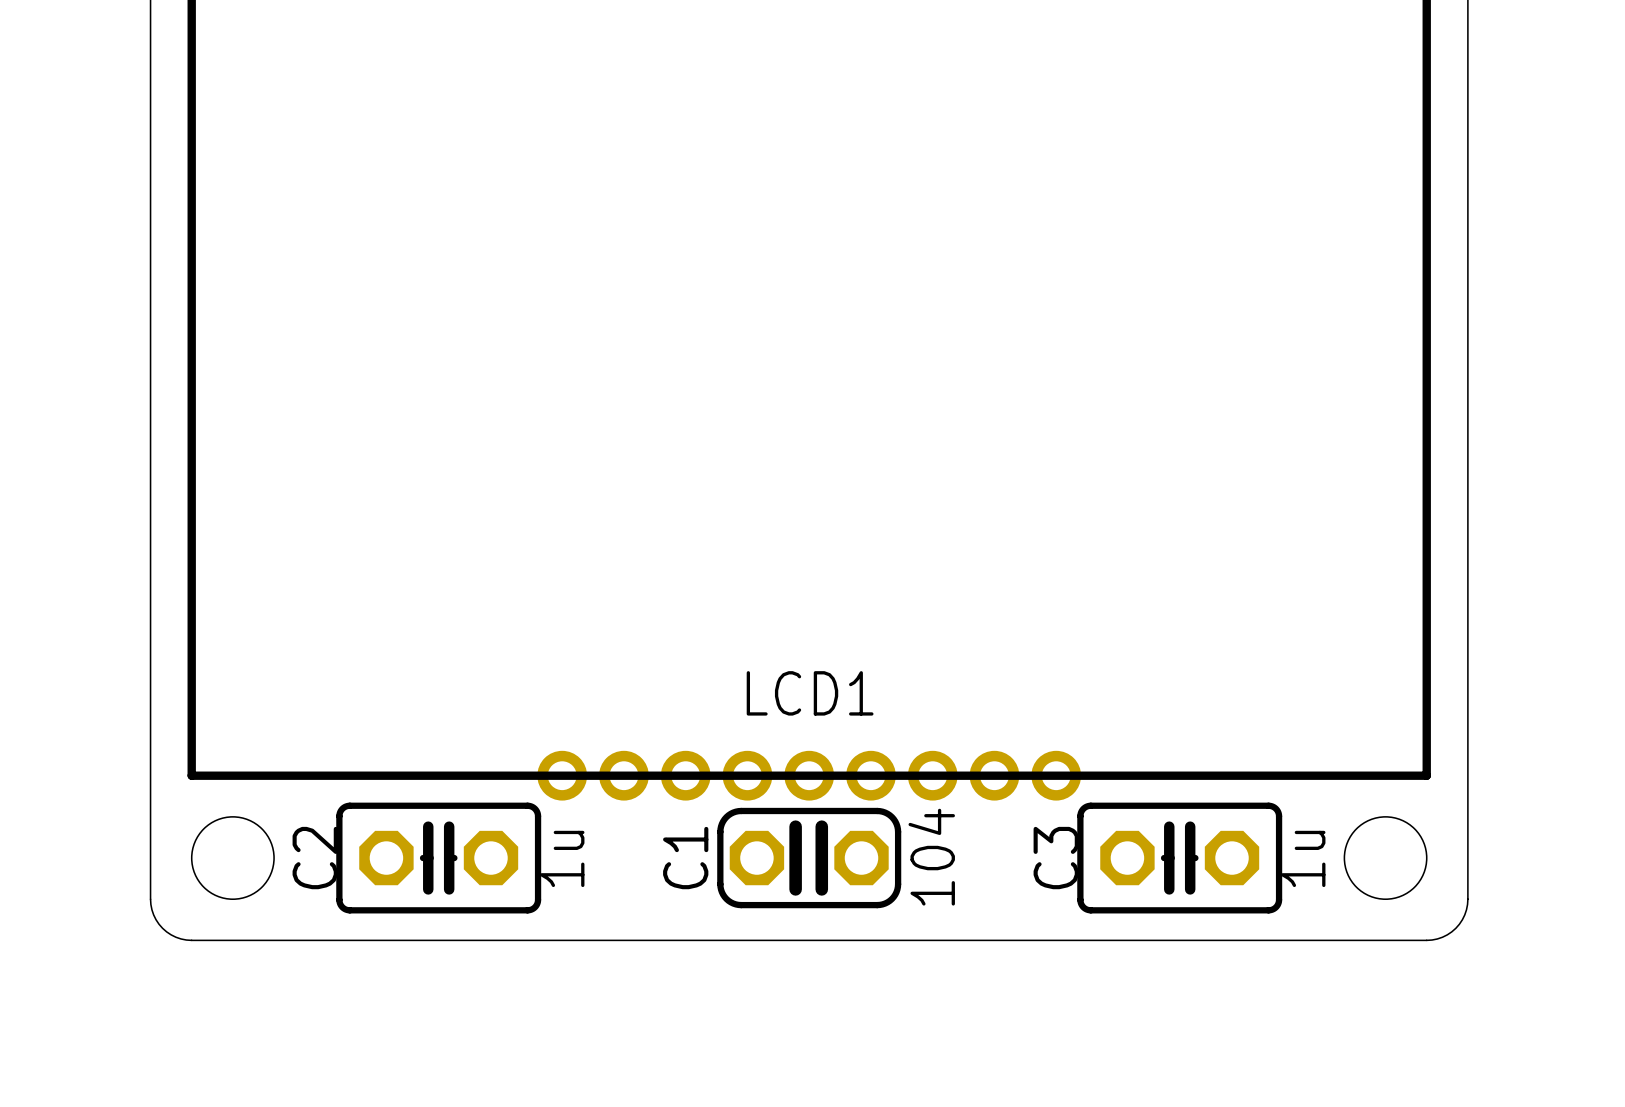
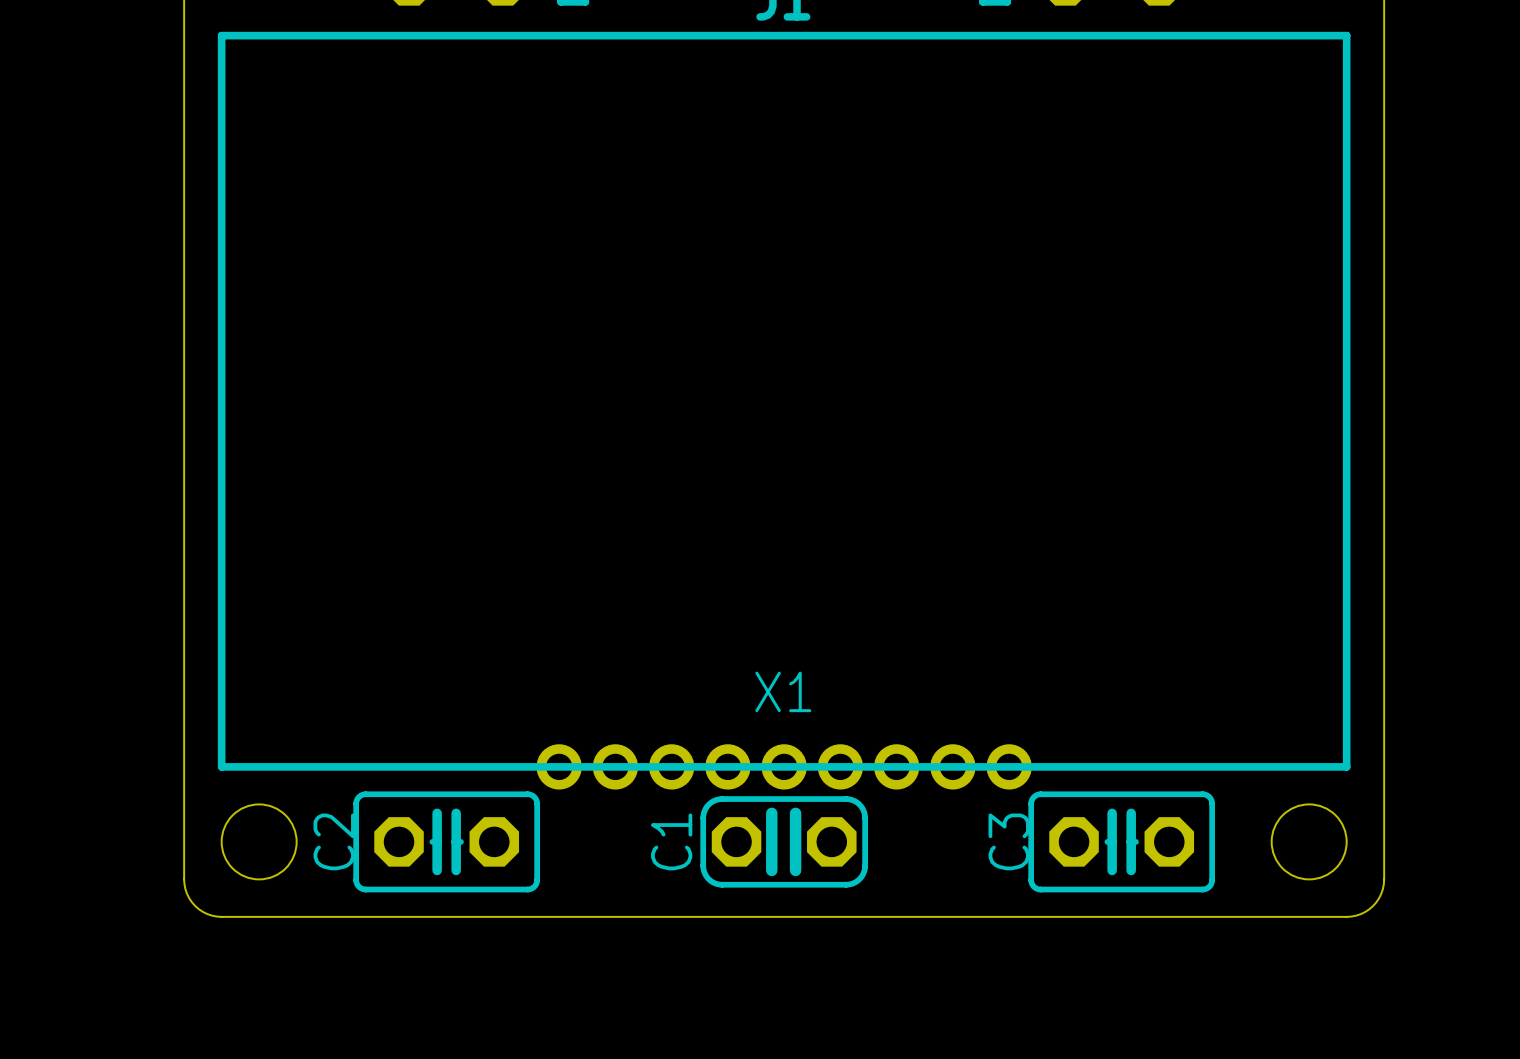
LCD1 name: LCD1 (810, 693) -> X1 (783, 691)
text: 104 (931, 857) -> none
text: 1u (562, 858) -> none
text: 1u (1303, 858) -> none

